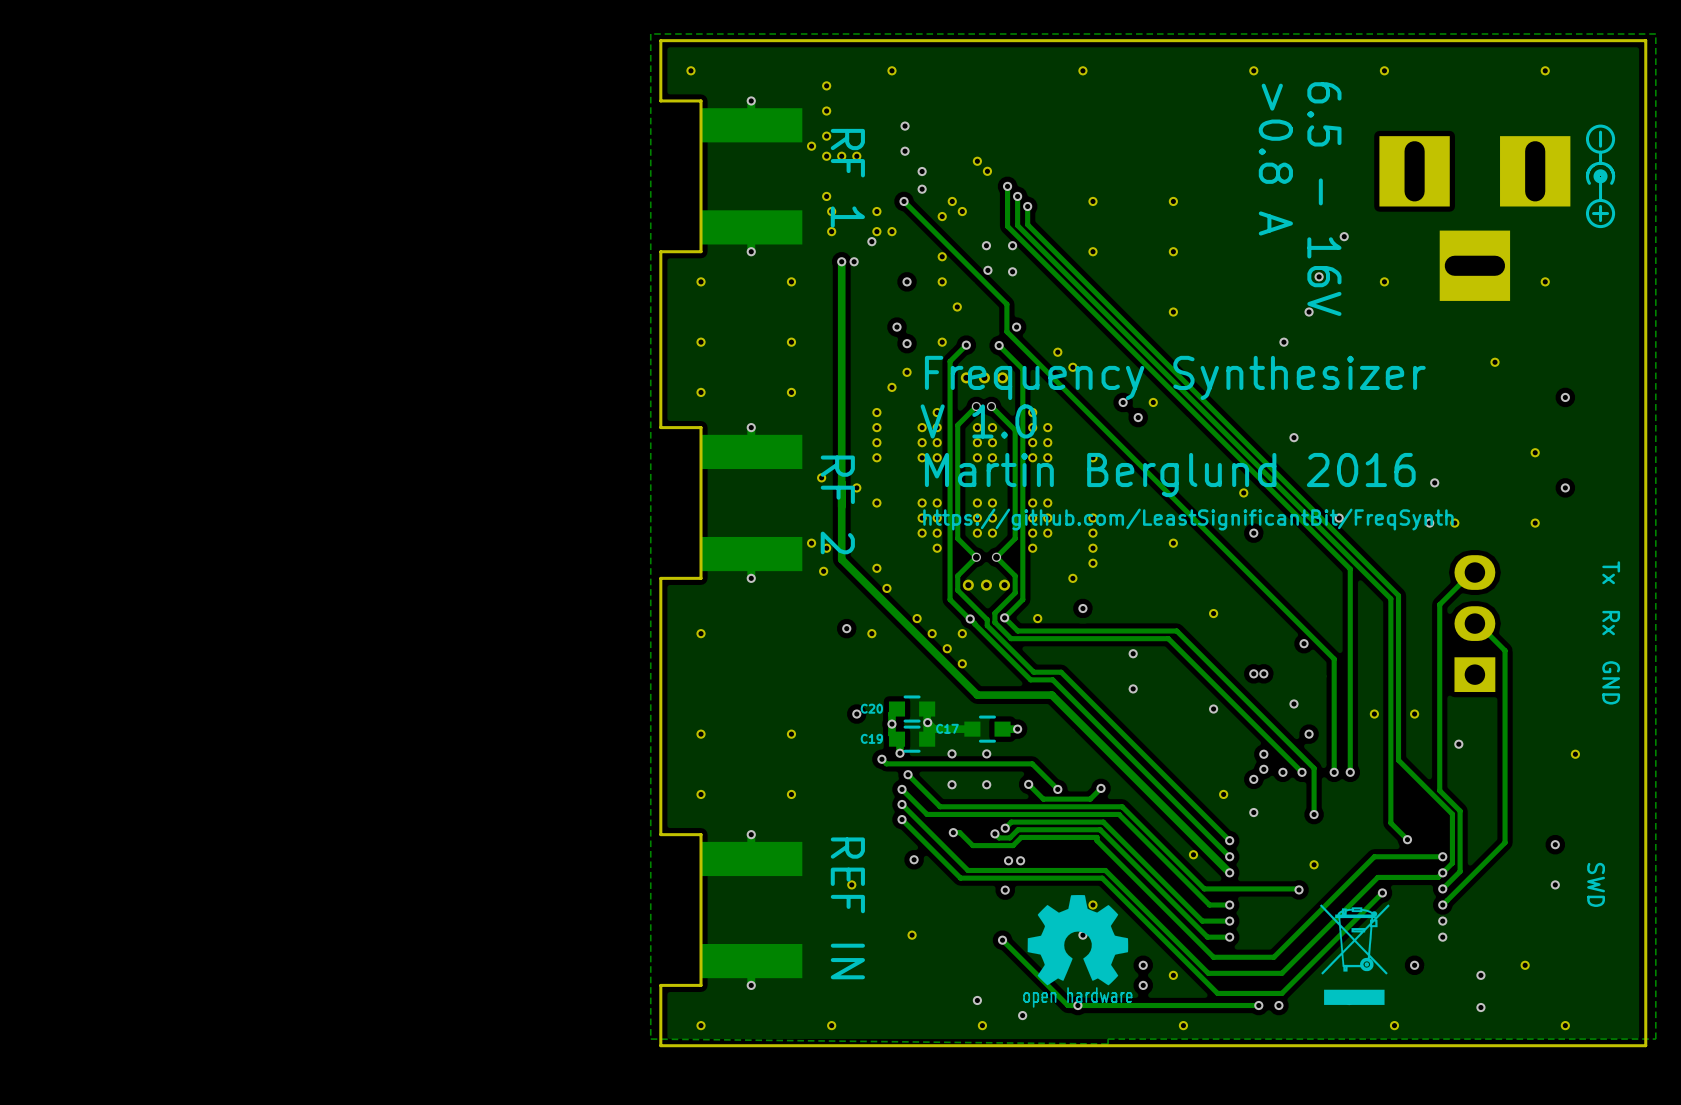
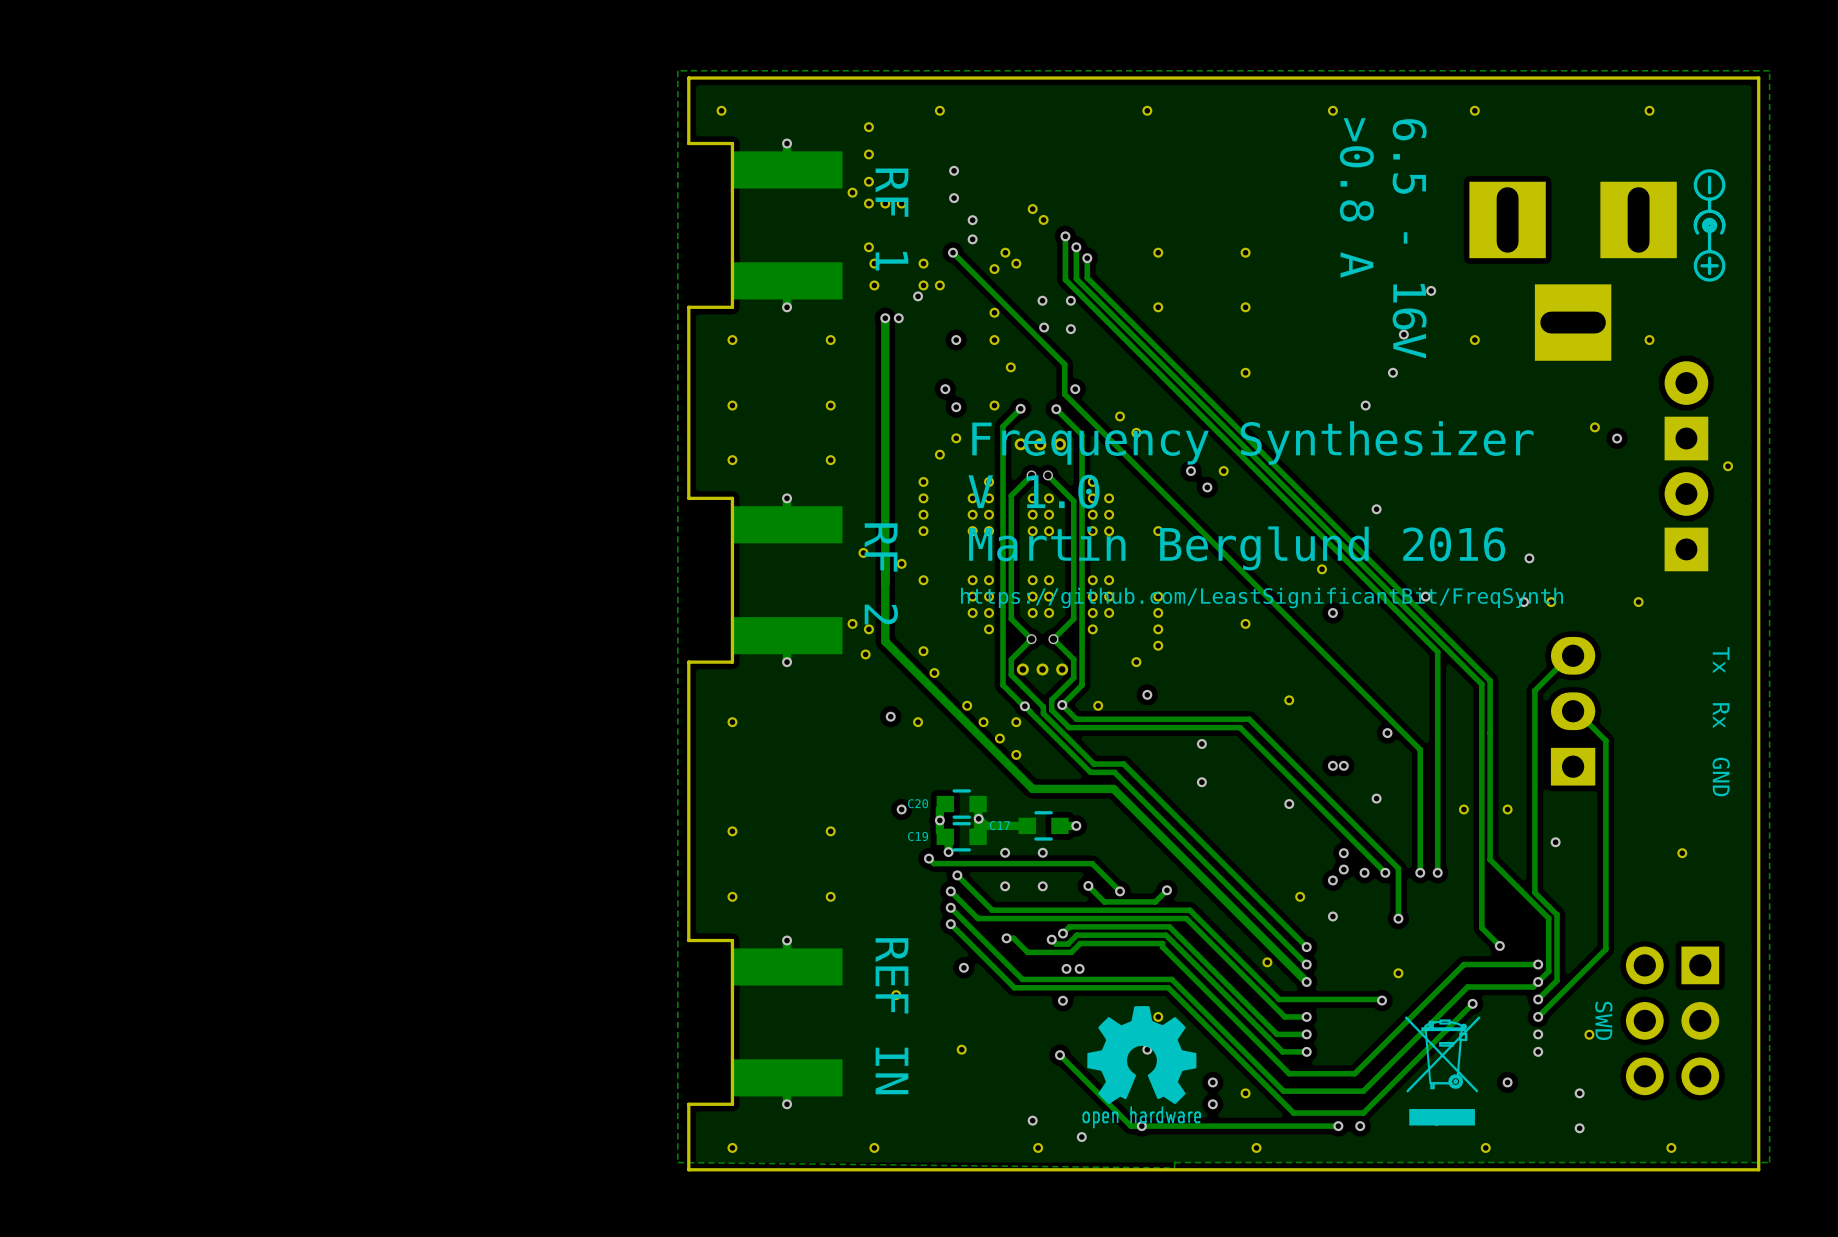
part: none -> (1686, 410)
via position: (1565, 397) -> (1617, 438)
part: none -> (1686, 521)
part position: (1535, 452) -> (1728, 466)
via: (1565, 487) -> none
via: (1309, 734) -> none
via: (1555, 844) -> none
via: (1555, 884) -> none
text position: SWD (1596, 884) -> SWD (1603, 1020)
part: none -> (1672, 1020)
part position: (1525, 965) -> (1589, 1034)

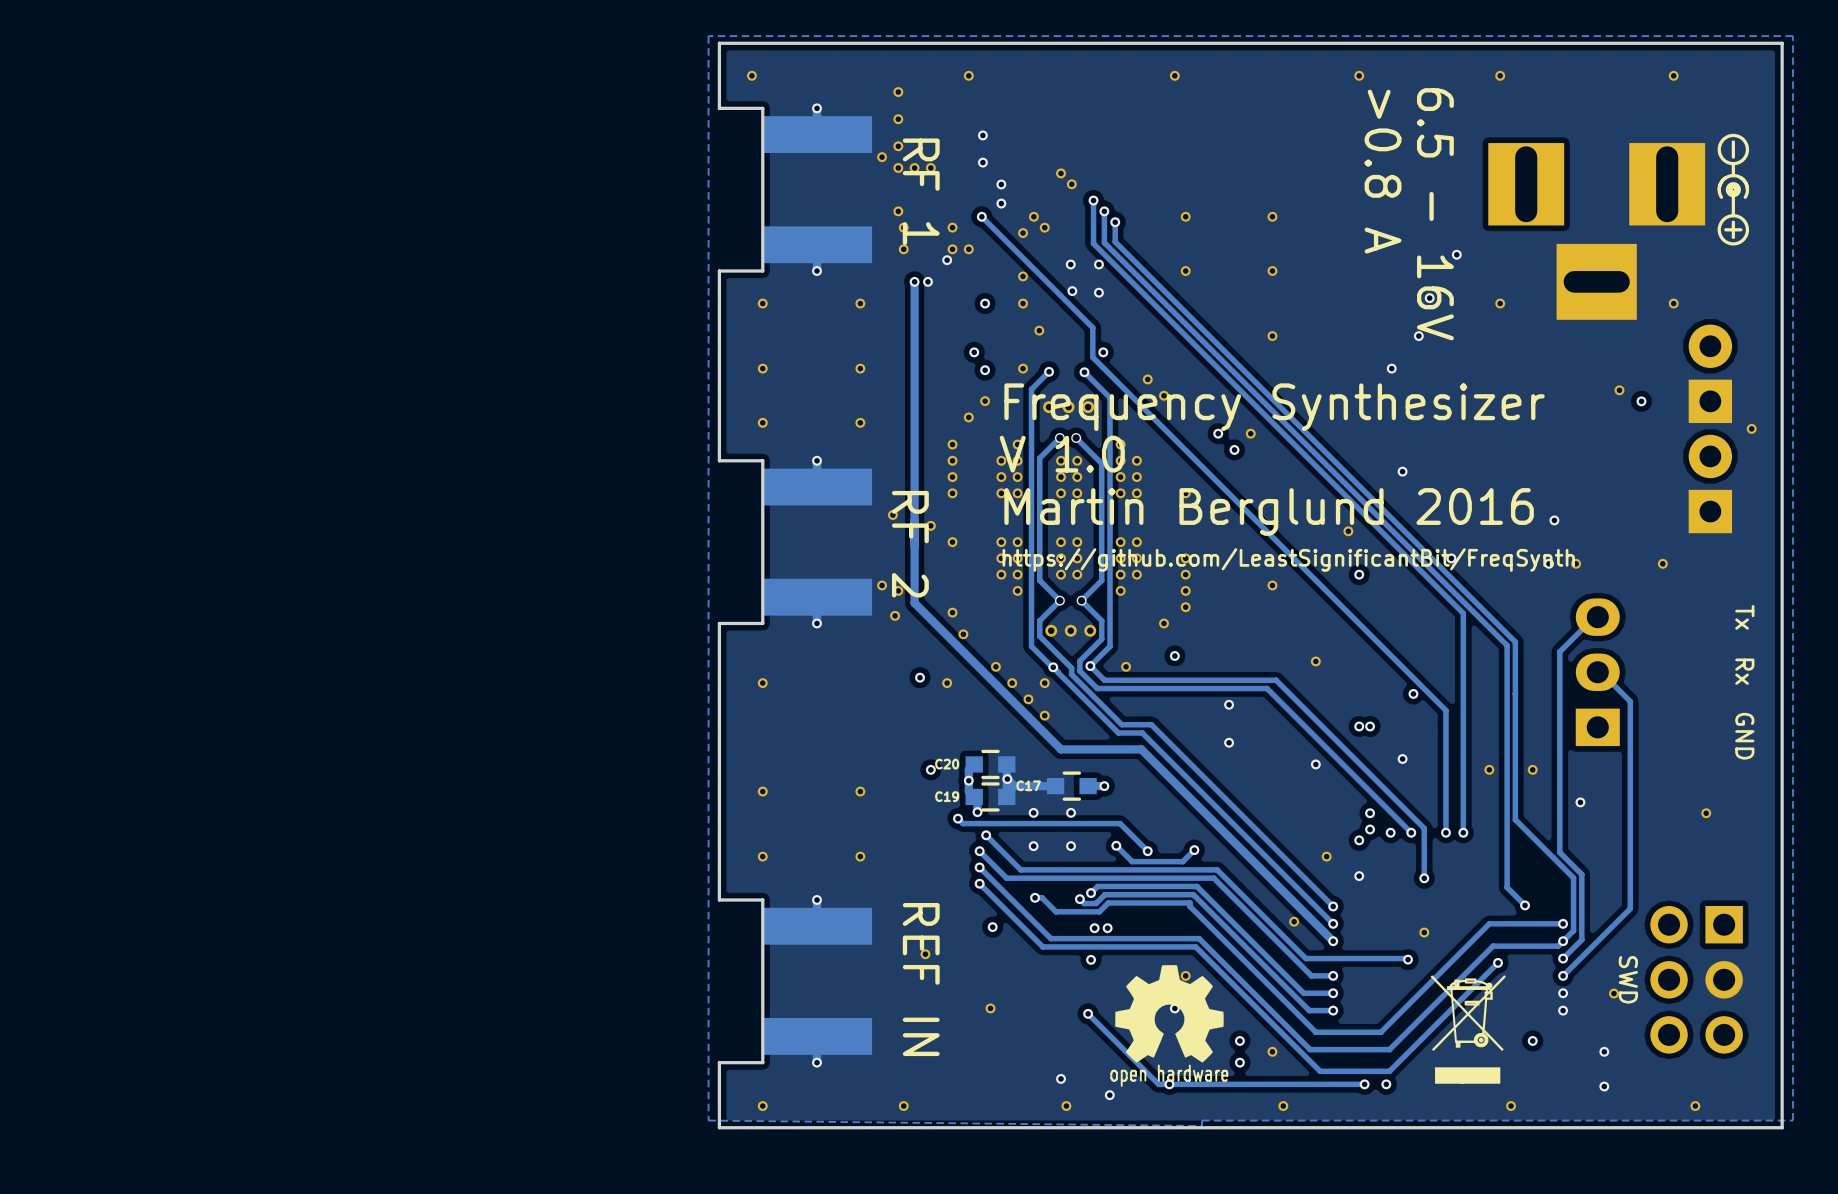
part footprint: [1469, 181, 1677, 361] -> [1488, 143, 1706, 320]

